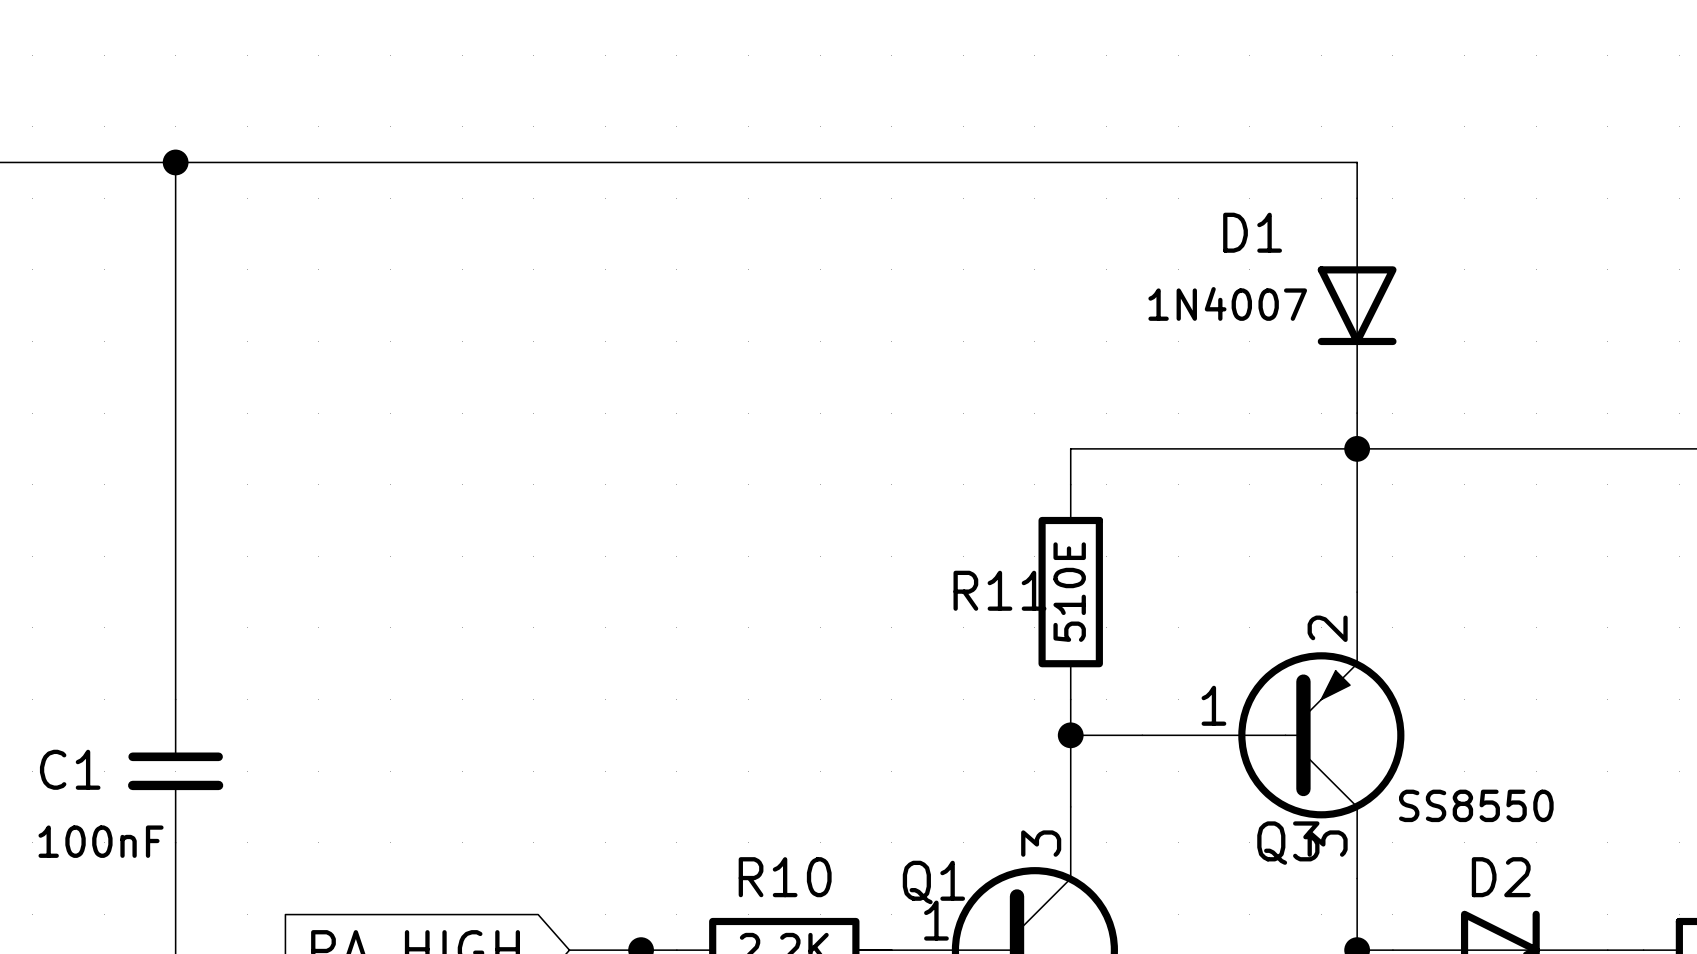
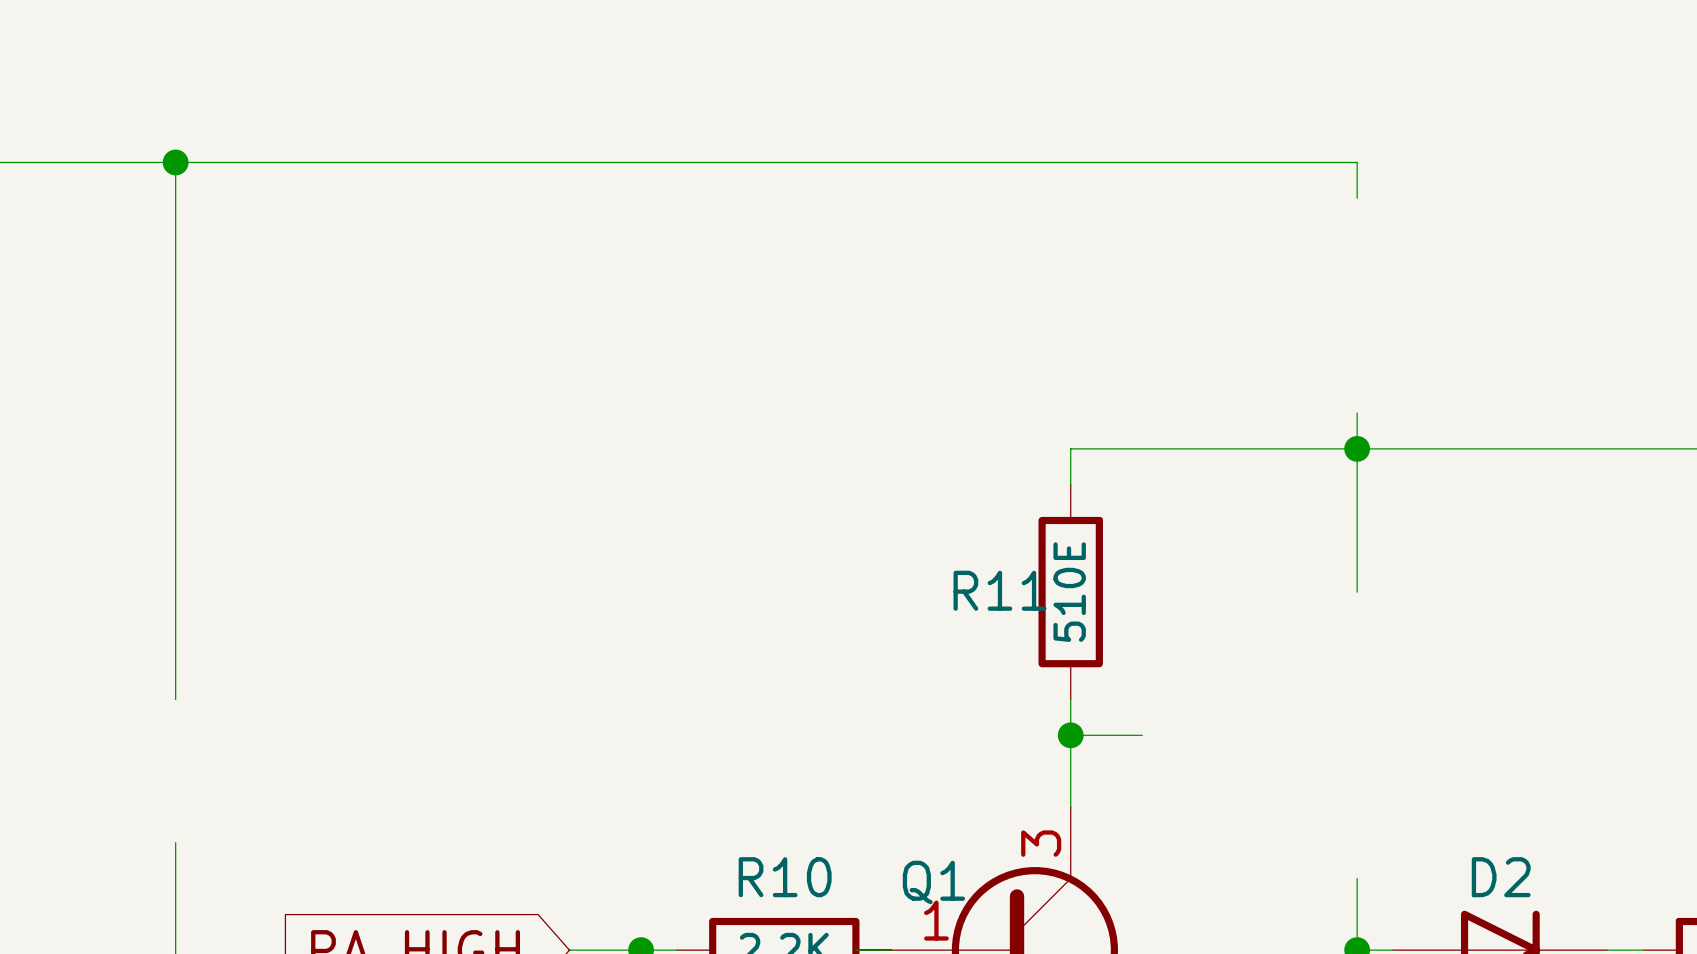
D1: 1N4007 (1357, 305) -> none
Q3: SS8550 (1273, 735) -> none
C1: 100nF (175, 771) -> none

